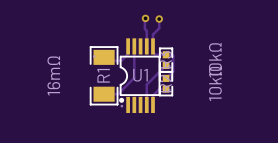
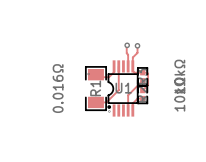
R1 value: 16mΩ (53, 75) -> 0.016Ω (58, 88)

